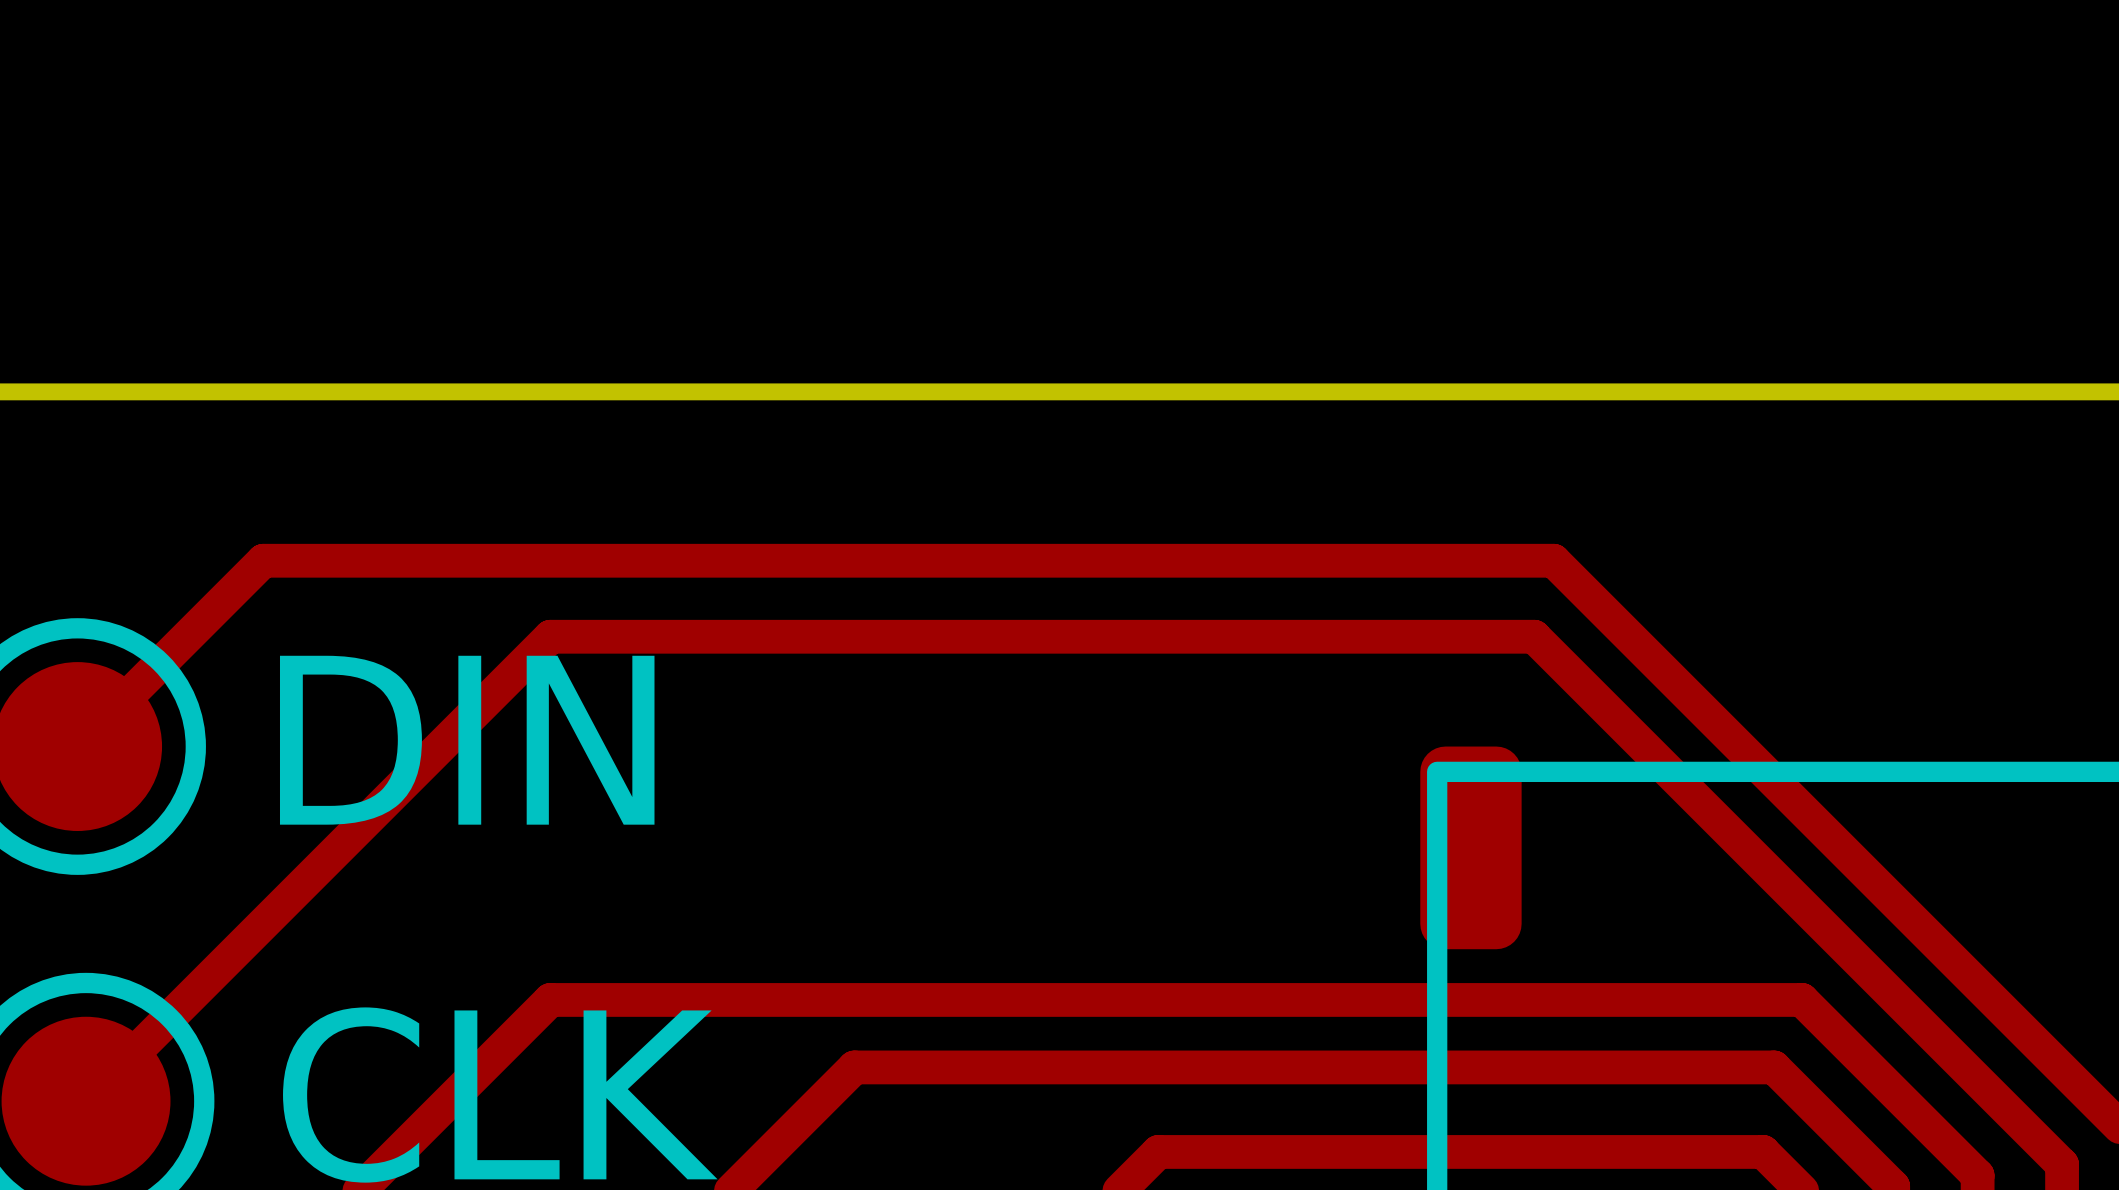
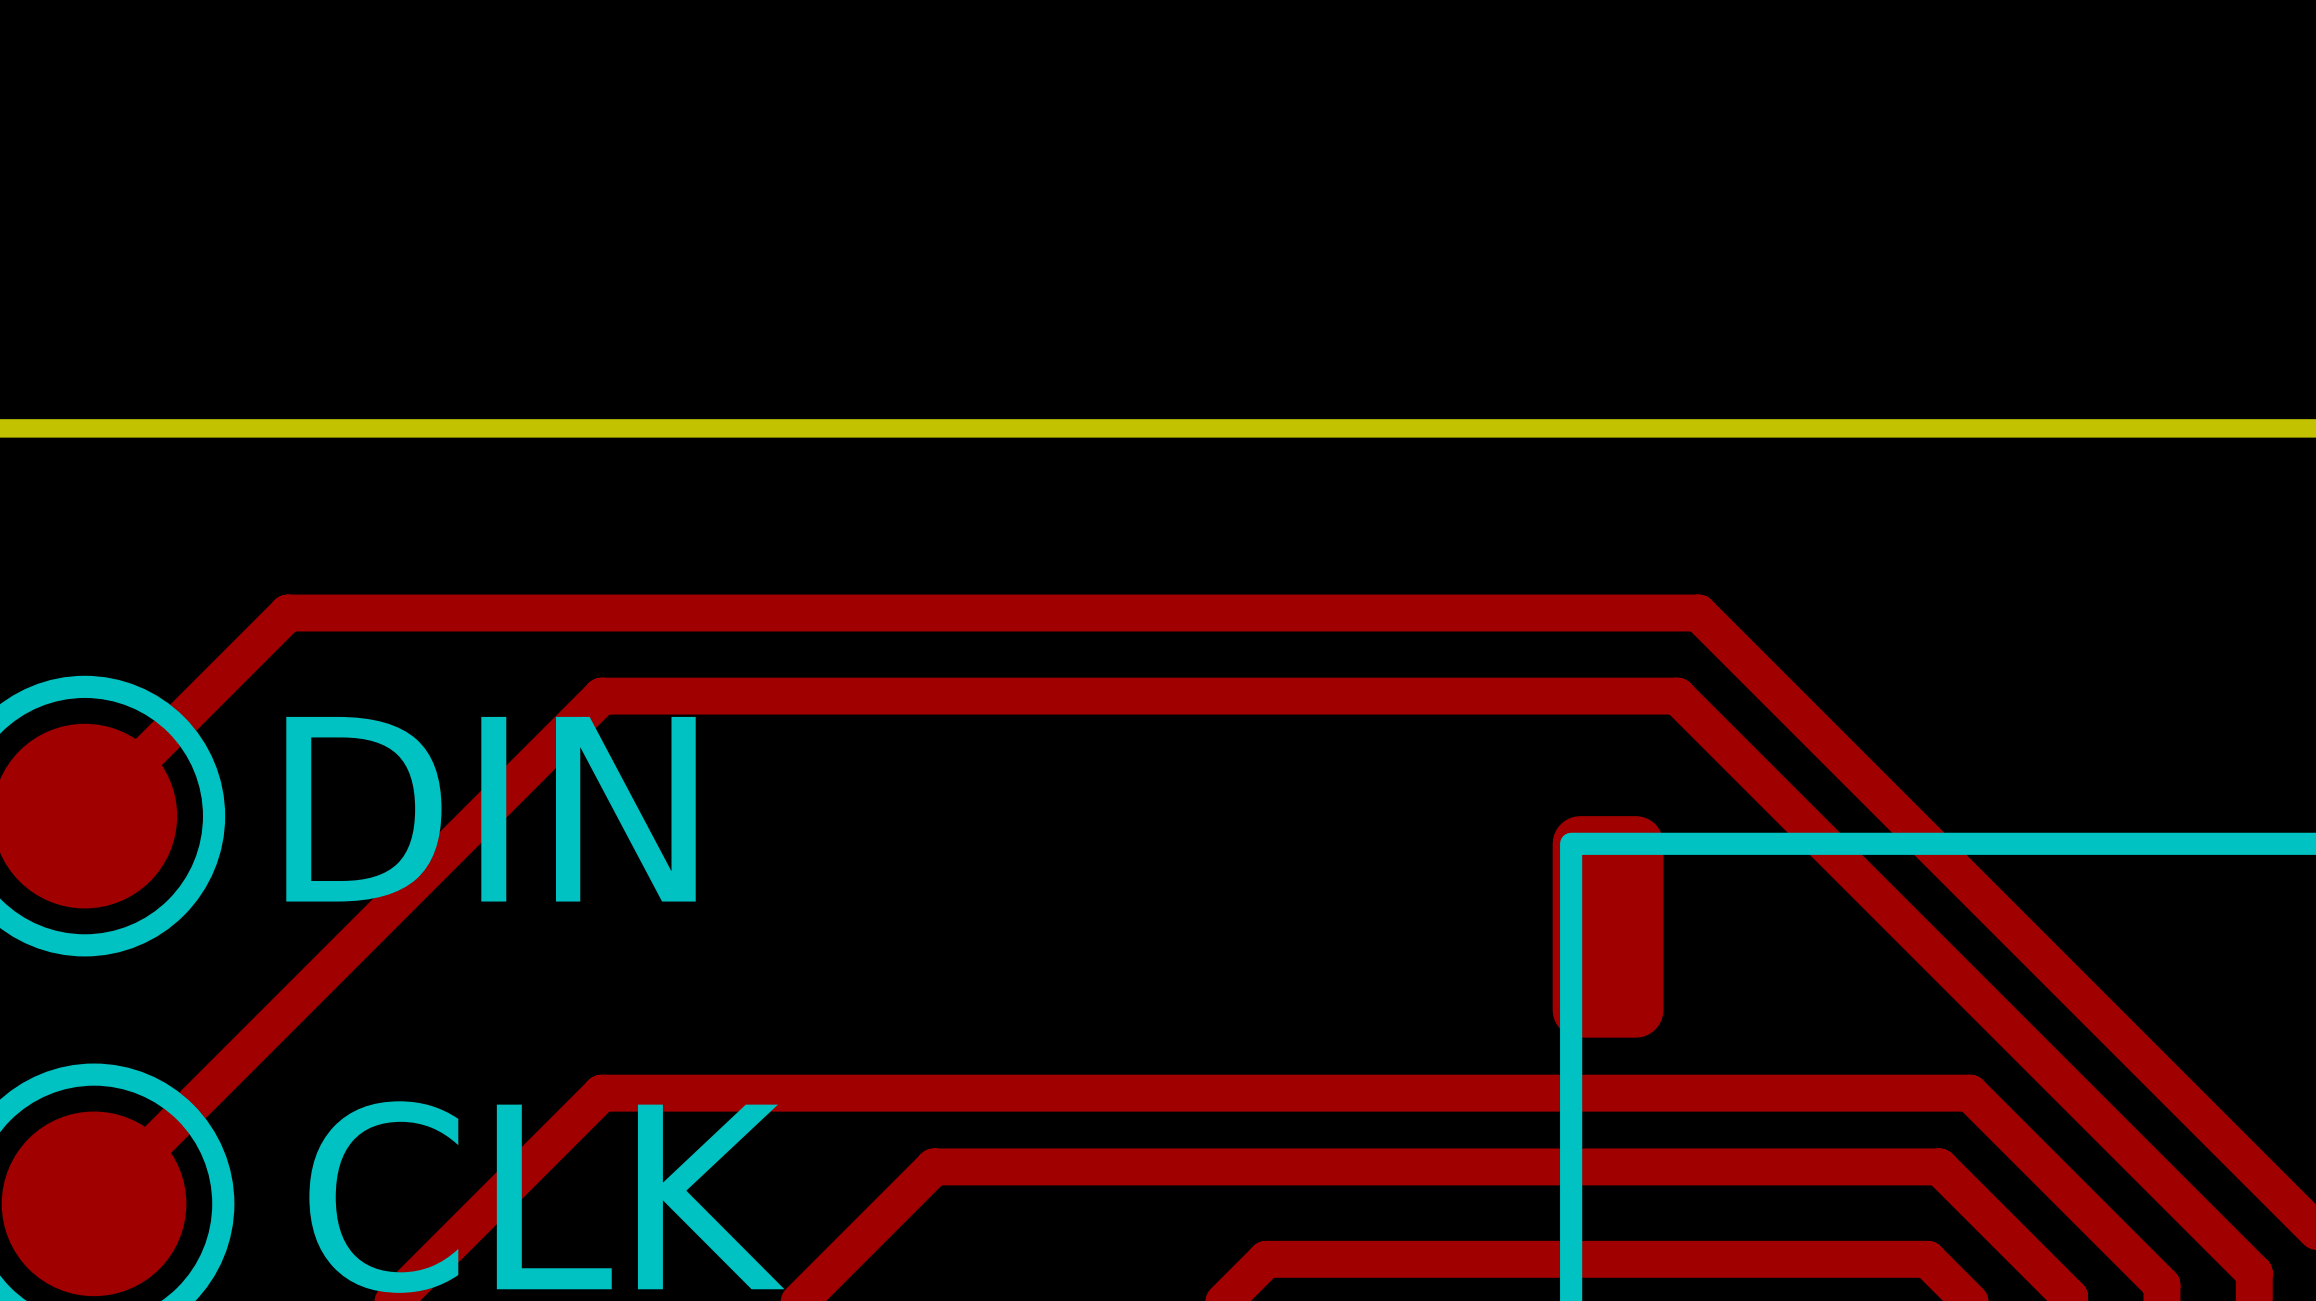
part text position: DIN (467, 740) -> DIN (491, 809)

